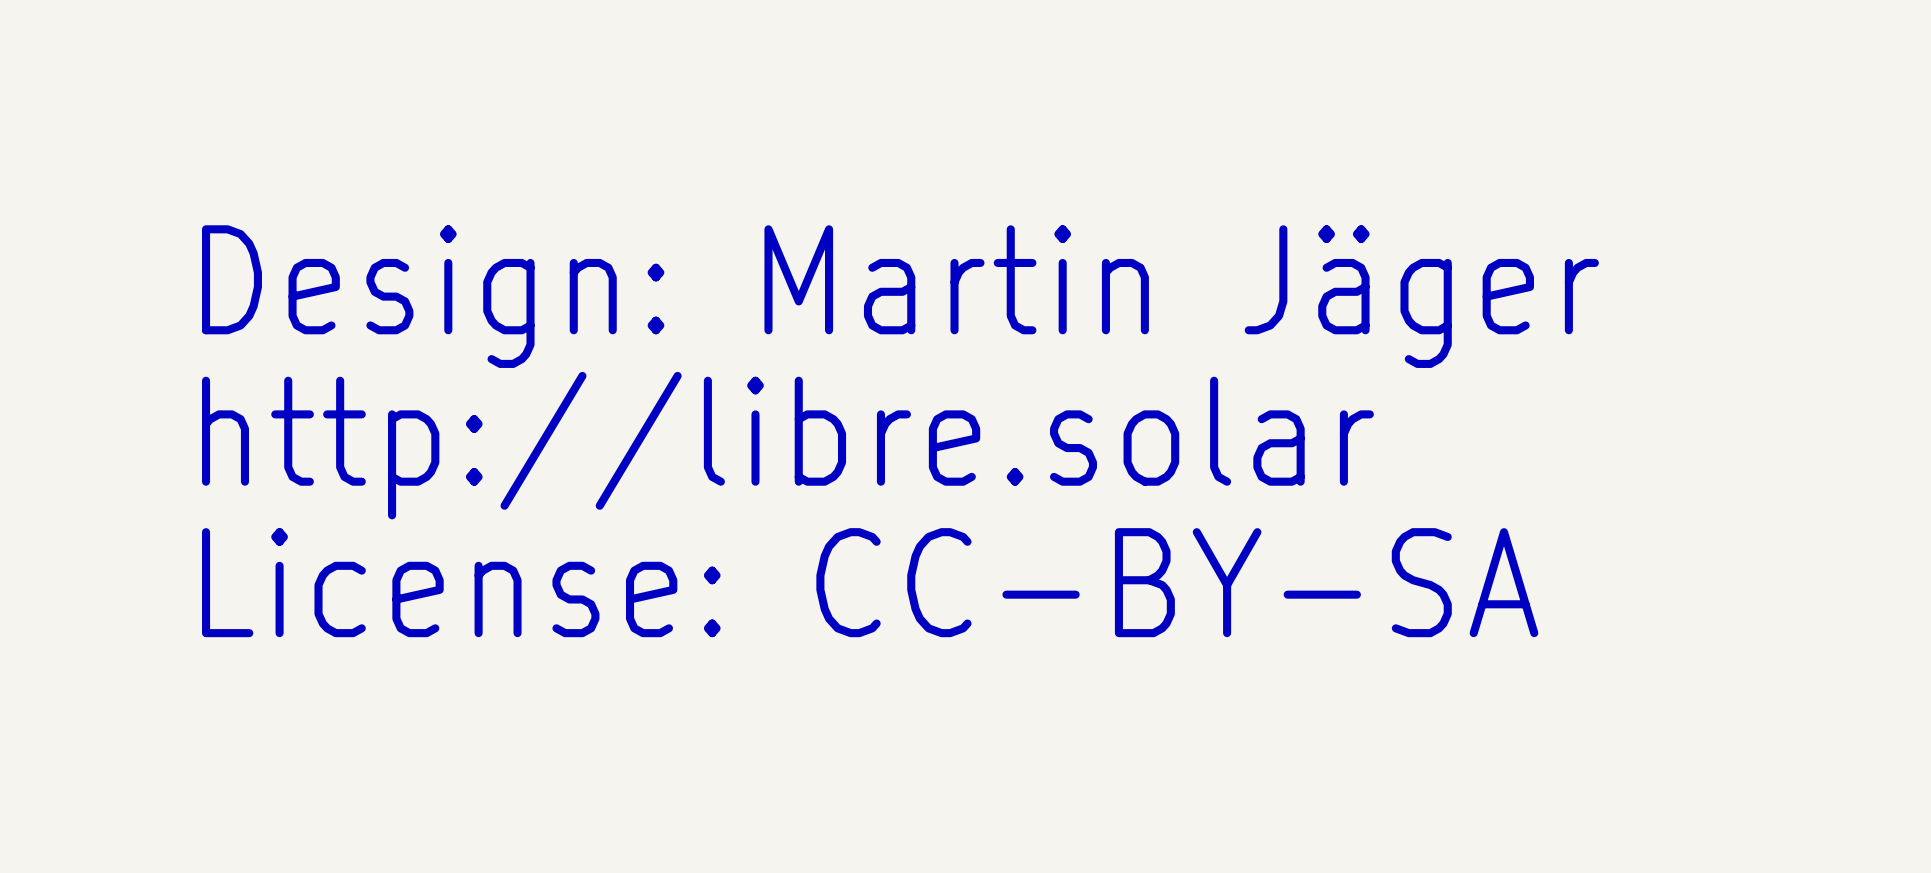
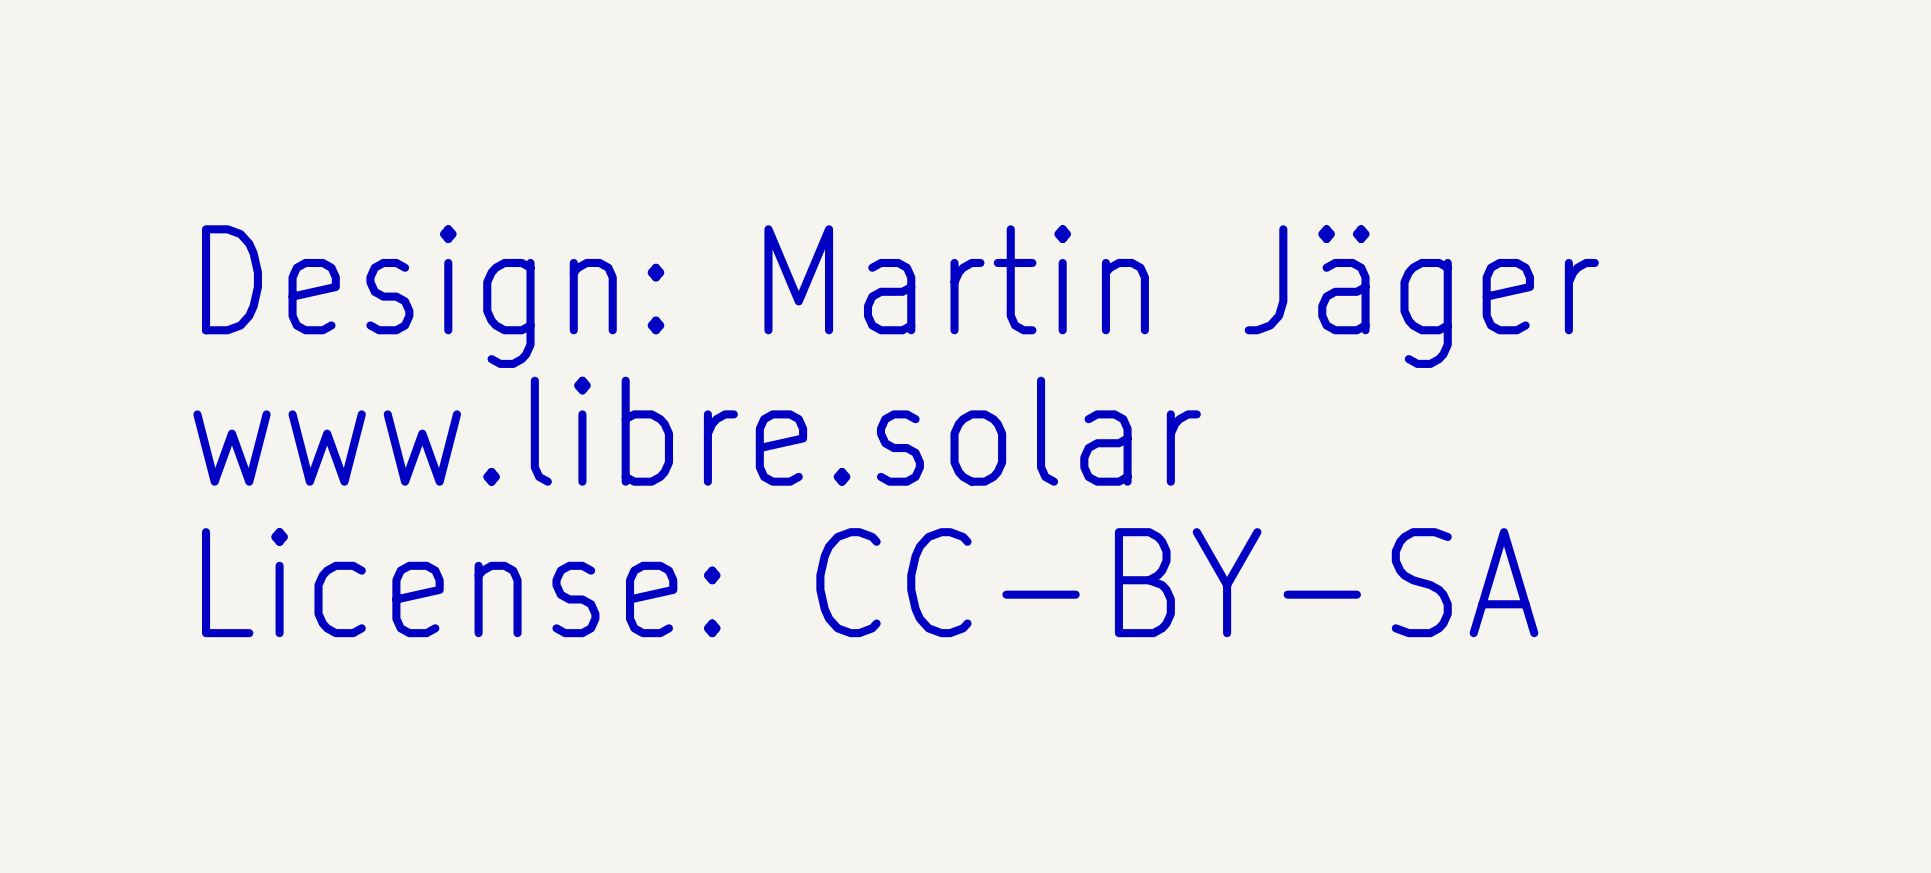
text: http://libre.solar (787, 445) -> www.libre.solar (697, 431)

